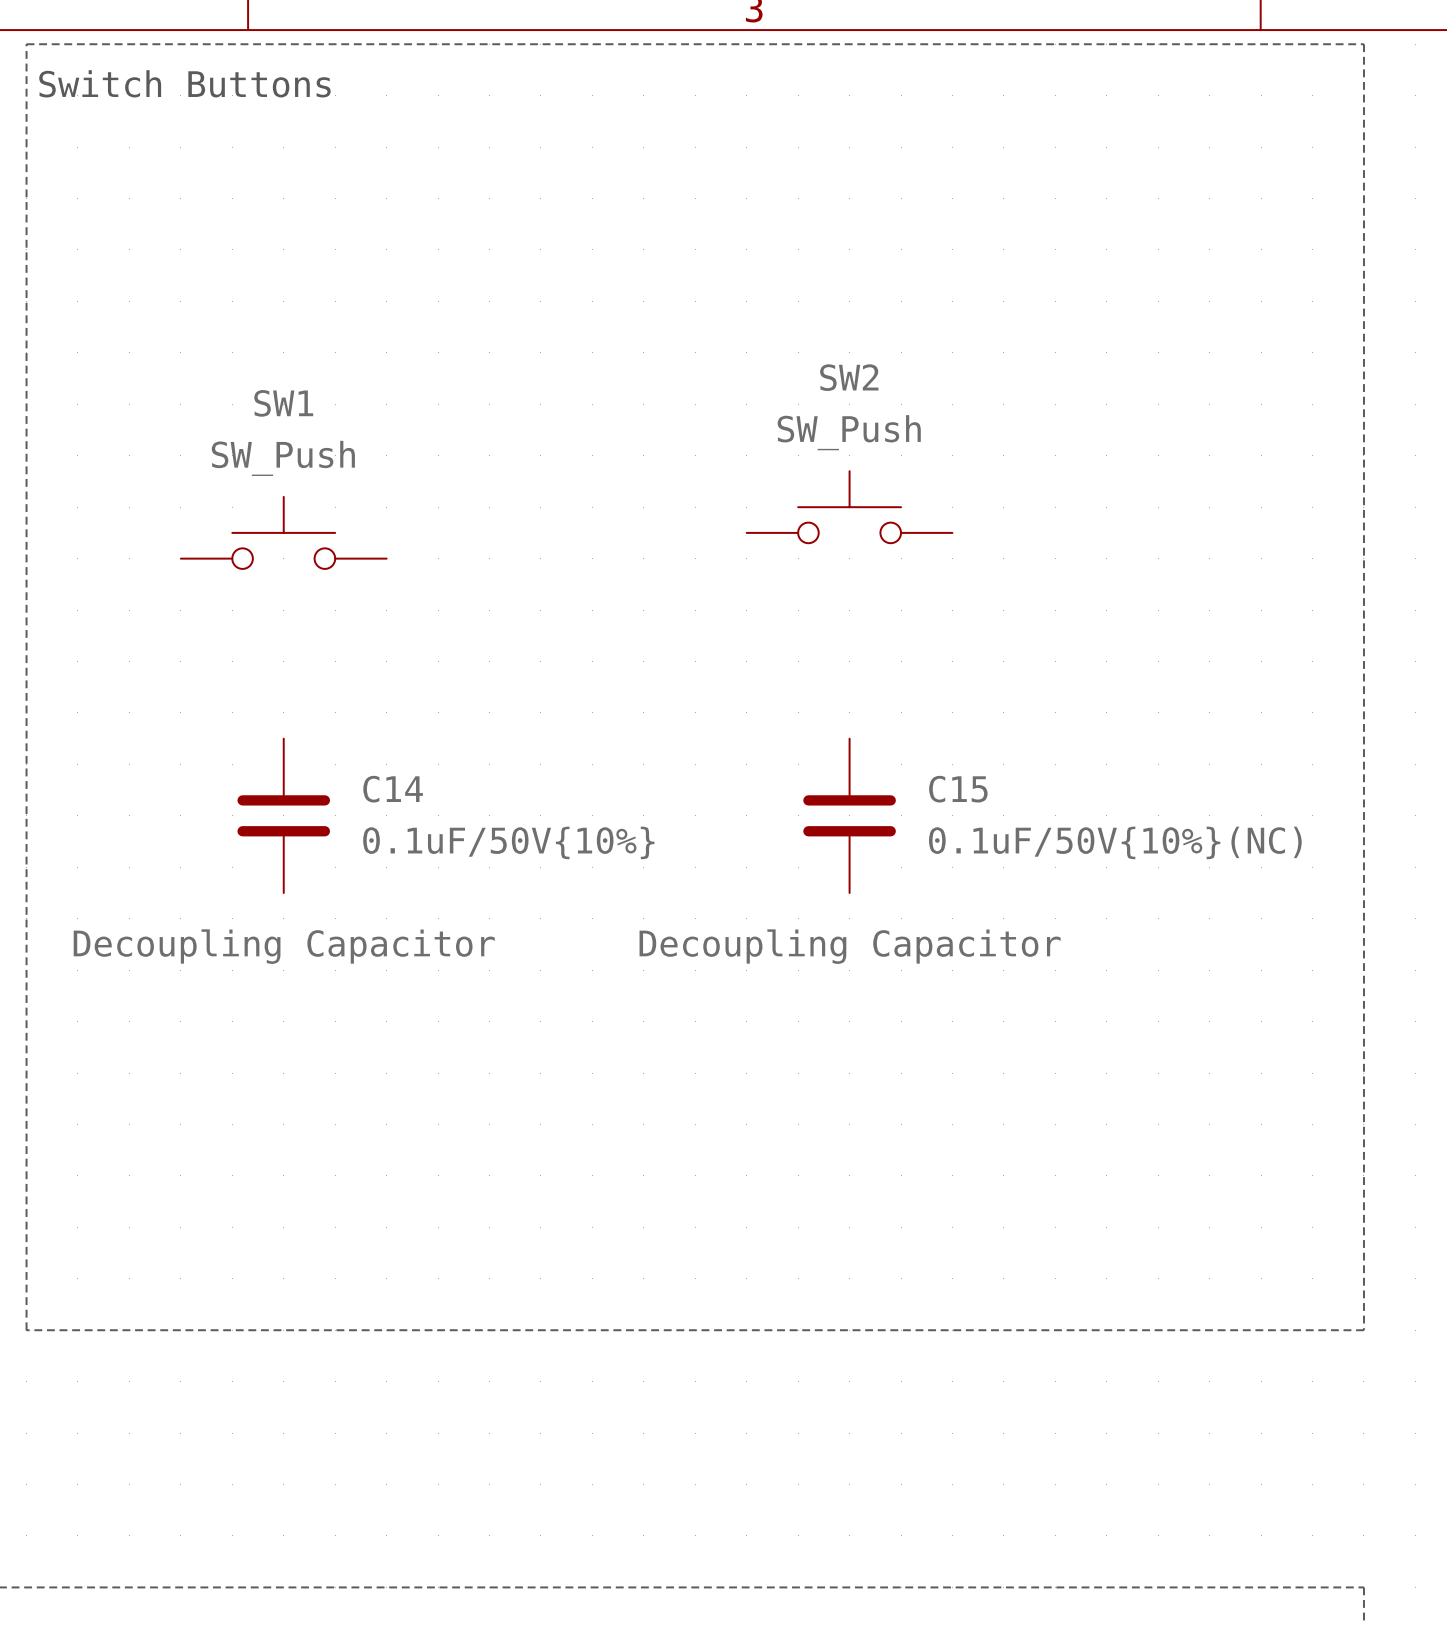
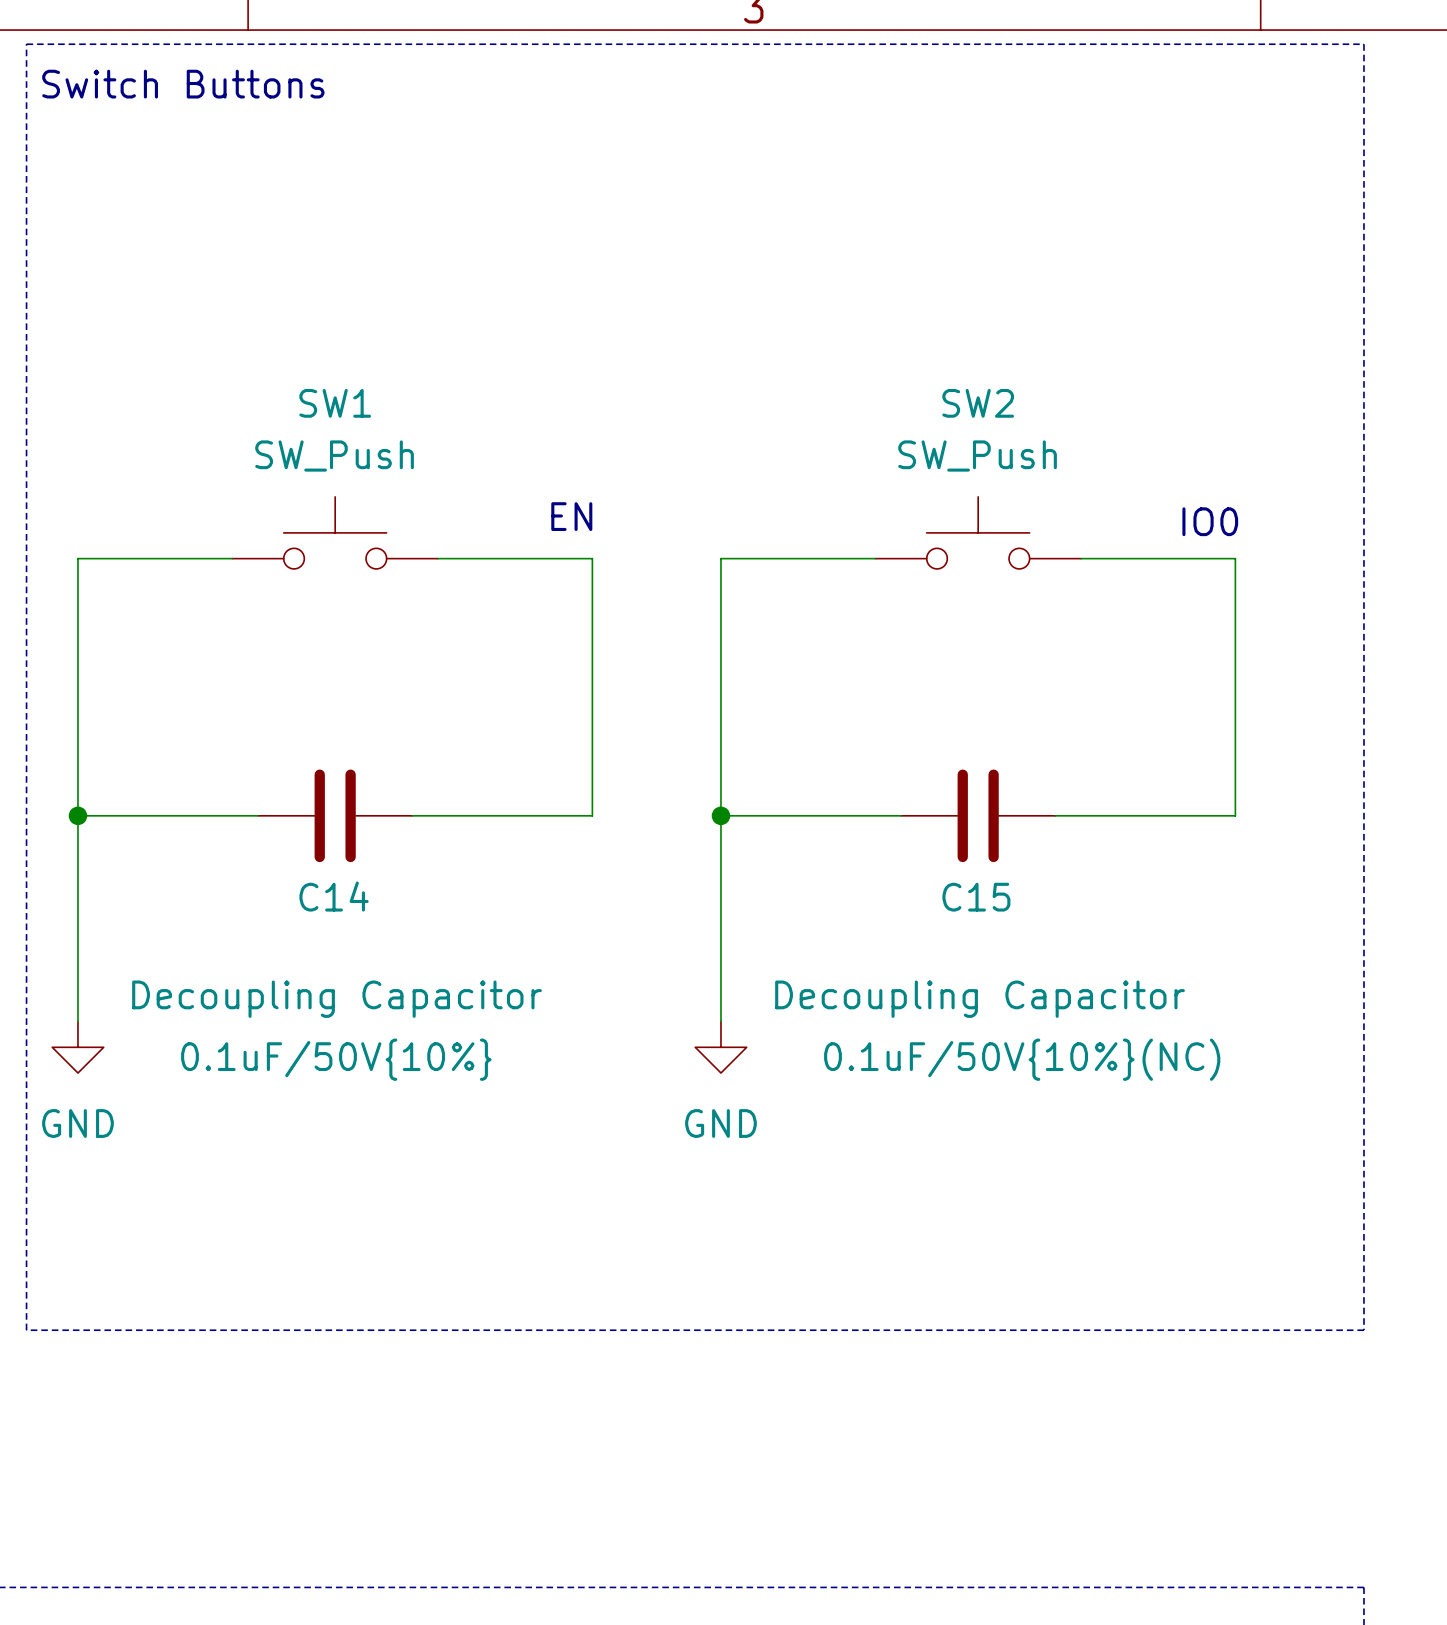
SW2 position: (849, 507) -> (978, 532)
text: none -> EN (571, 516)
text: none -> IO0 (1210, 521)
SW1 position: (283, 532) -> (335, 532)
wire: none -> (232, 558) (77, 558) (77, 1021)
wire: none -> (438, 558) (592, 558) (592, 815) (412, 815)
wire: none -> (875, 558) (720, 558) (720, 1021)
wire: none -> (1081, 558) (1235, 558) (1235, 815) (1055, 815)
C14 name position: C14 (393, 789) -> C14 (334, 896)
C15 name position: C15 (958, 789) -> C15 (976, 897)
wire: none -> (77, 815) (258, 815)
junction: none -> (77, 815)
C14 rotation: 0° (283, 815) -> 90° clockwise (335, 815)
wire: none -> (720, 815) (901, 815)
junction: none -> (720, 815)
C15 rotation: 0° (849, 815) -> 90° clockwise (978, 815)
C15 position: (849, 815) -> (978, 815)
C14 value position: 0.1uF/50V{10%} (508, 842) -> 0.1uF/50V{10%} (336, 1059)
C15 value position: 0.1uF/50V{10%}(NC) (1115, 842) -> 0.1uF/50V{10%}(NC) (1022, 1059)
C14 text position: Decoupling Capacitor (284, 946) -> Decoupling Capacitor (337, 999)
C15 text position: Decoupling Capacitor (850, 946) -> Decoupling Capacitor (980, 999)
power symbol: none -> GND (77, 1047)
power symbol: none -> GND (720, 1047)

